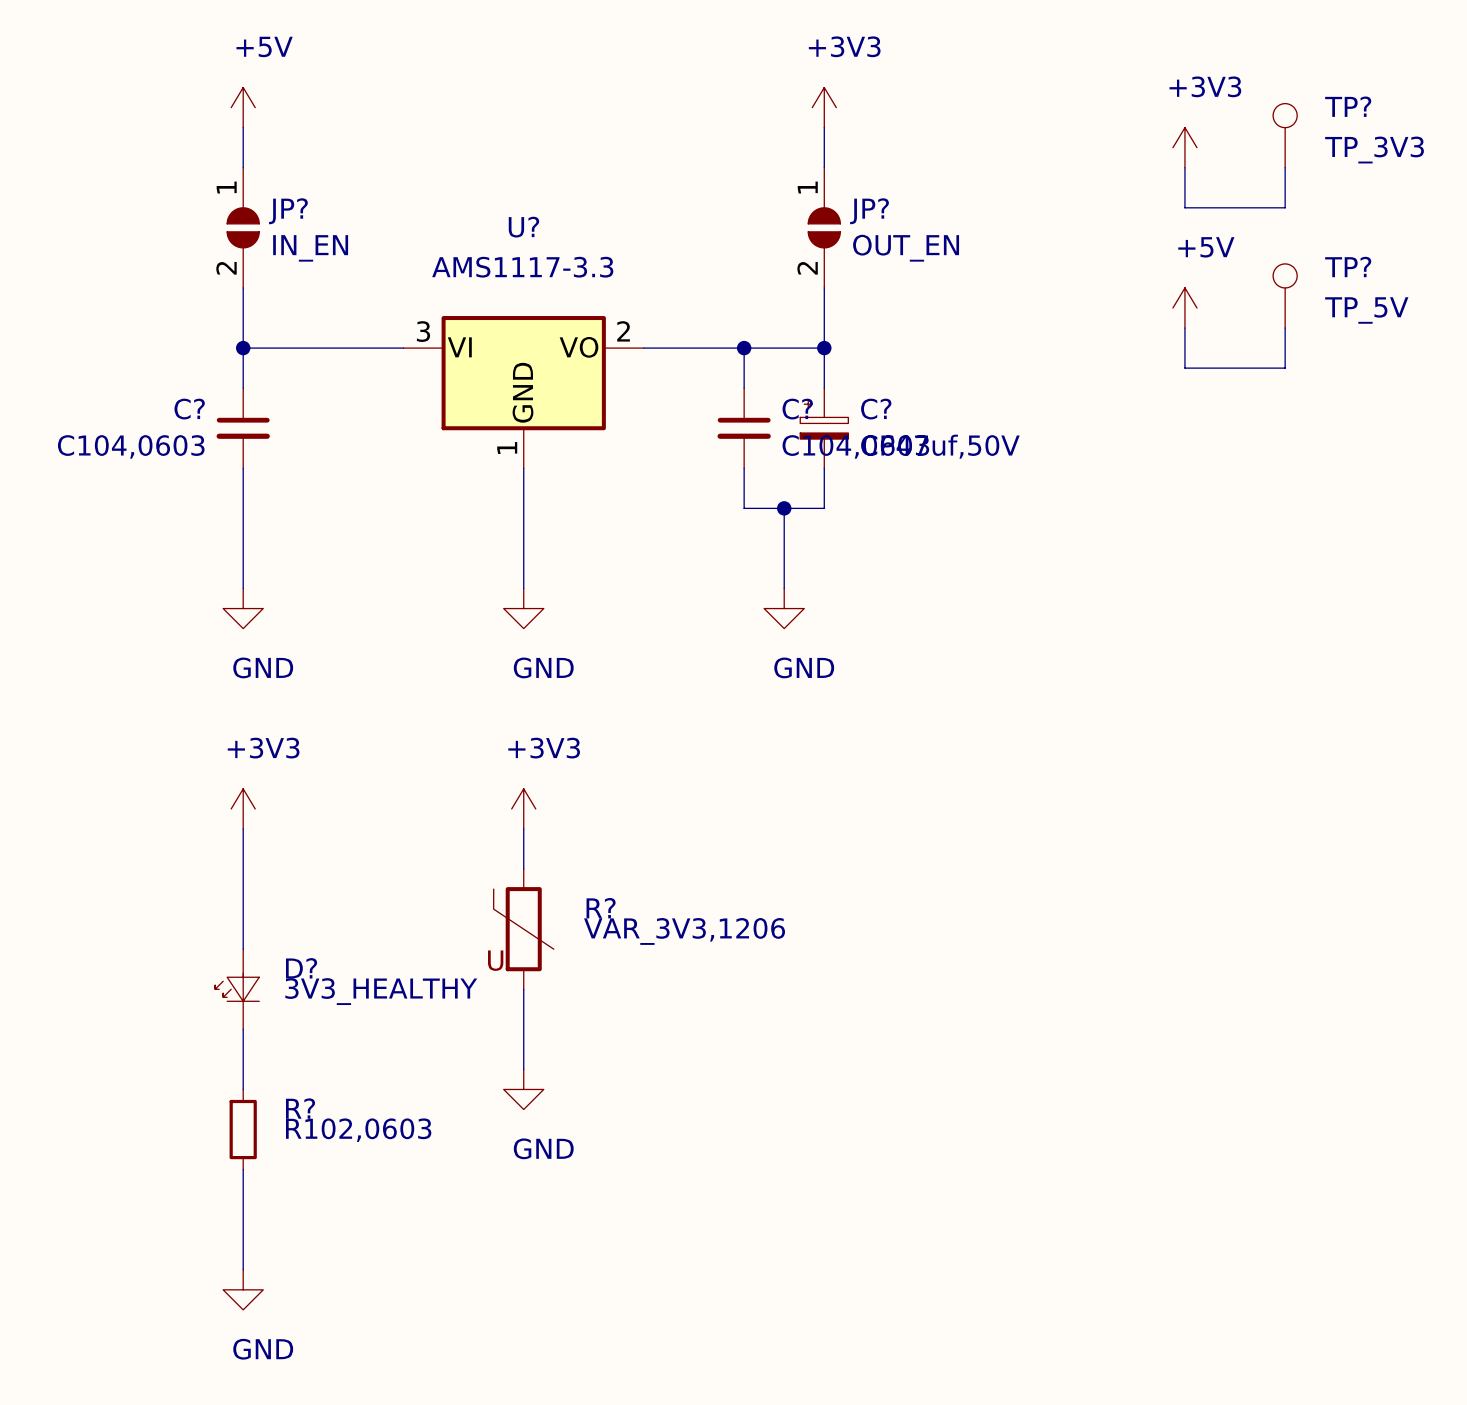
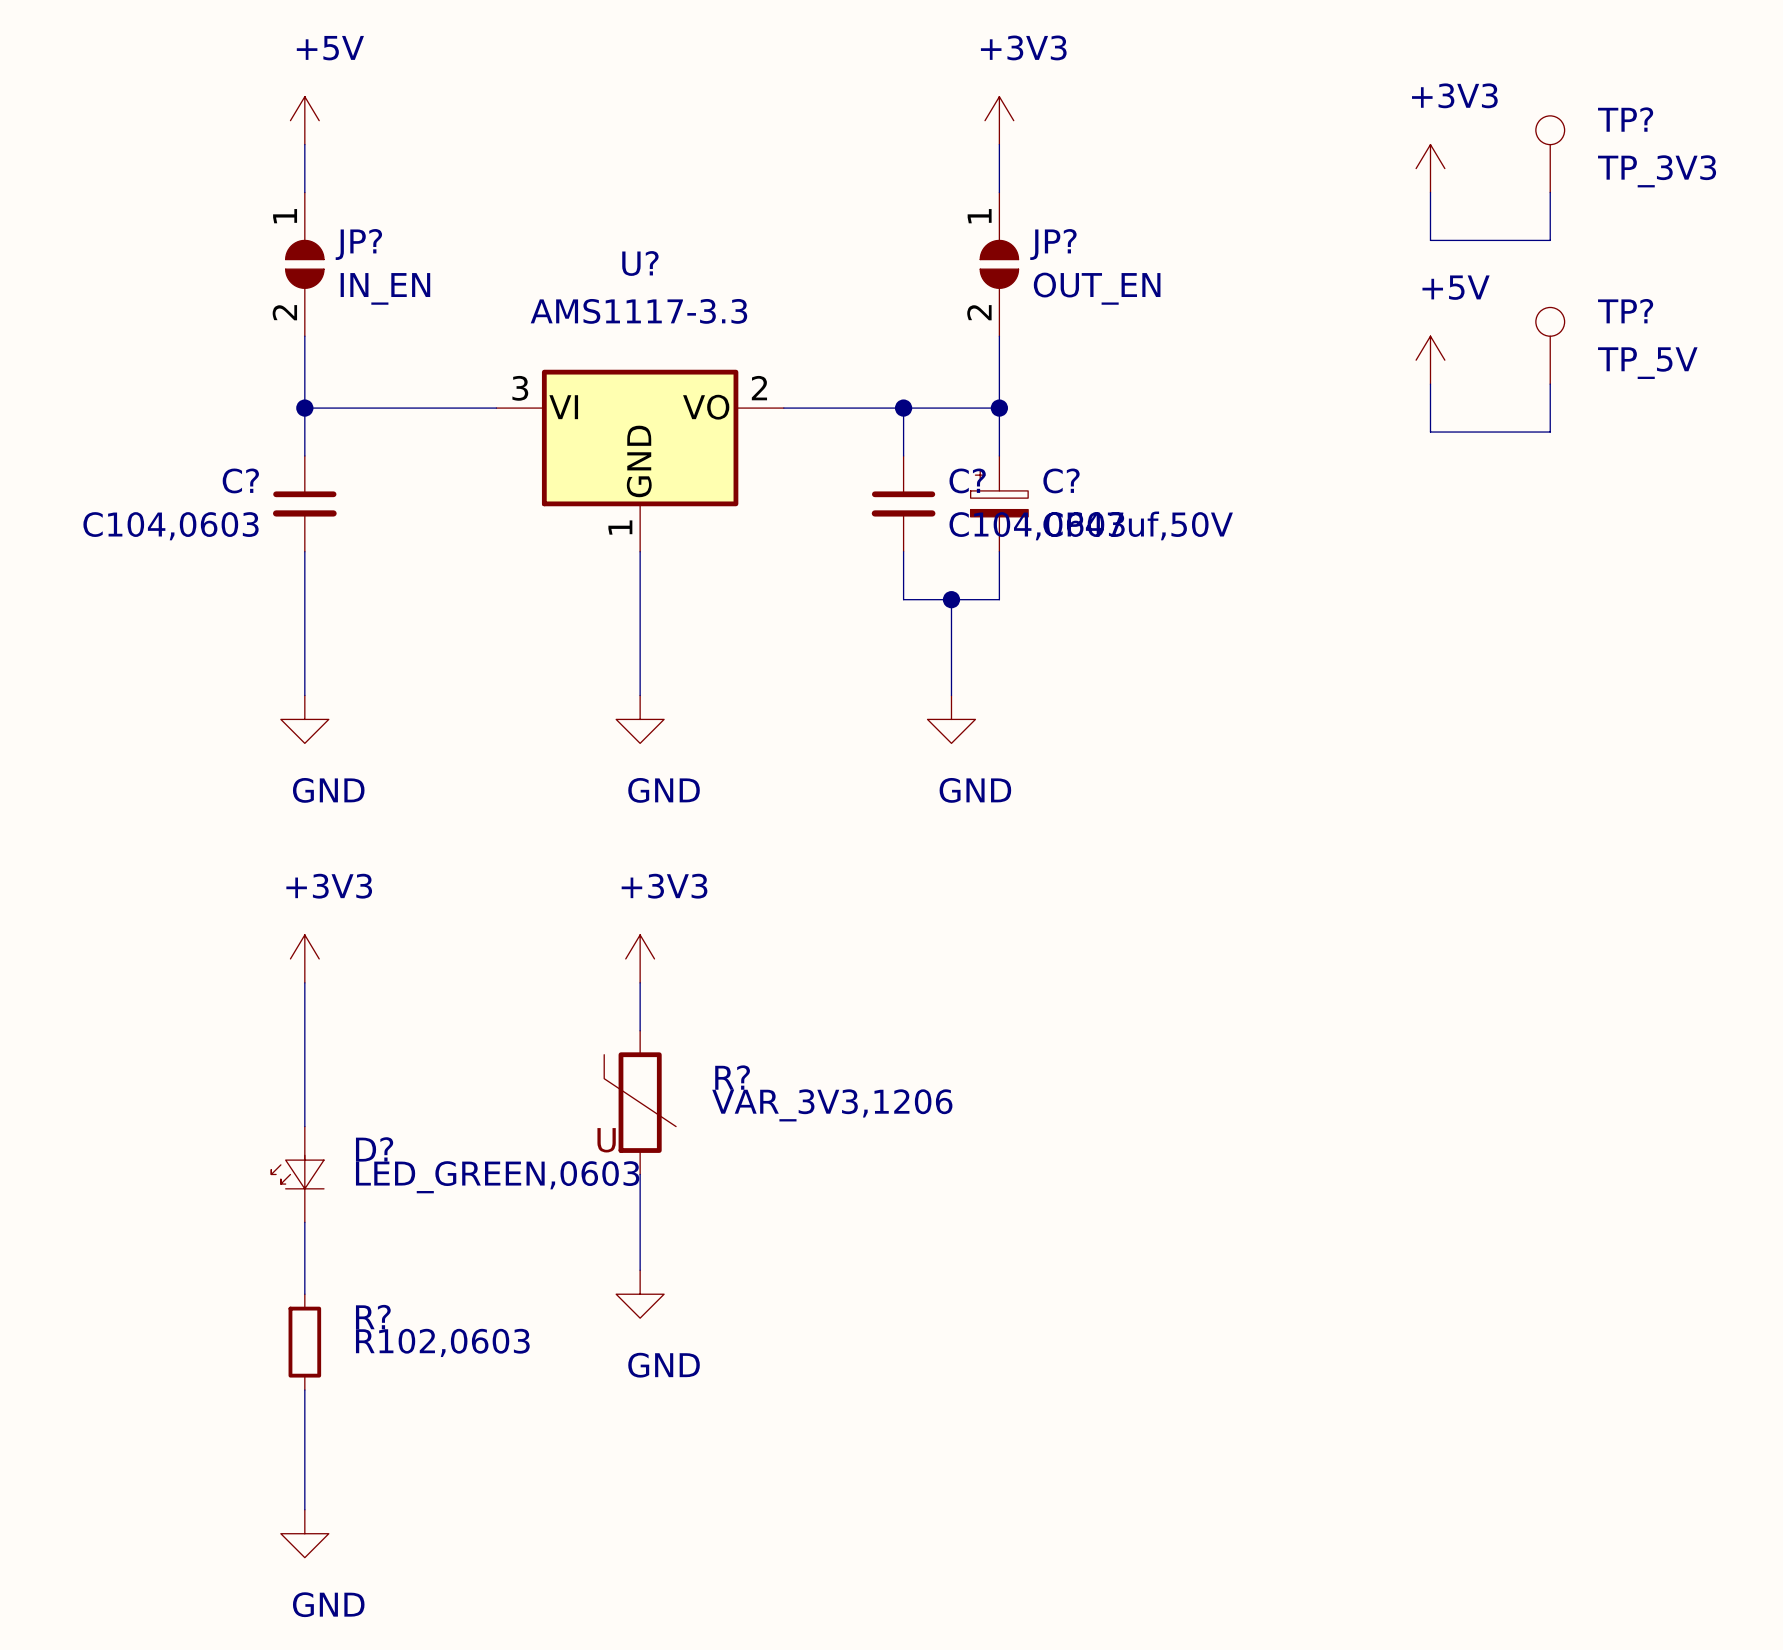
D? value: 3V3_HEALTHY (381, 991) -> LED_GREEN,0603 (497, 1177)

